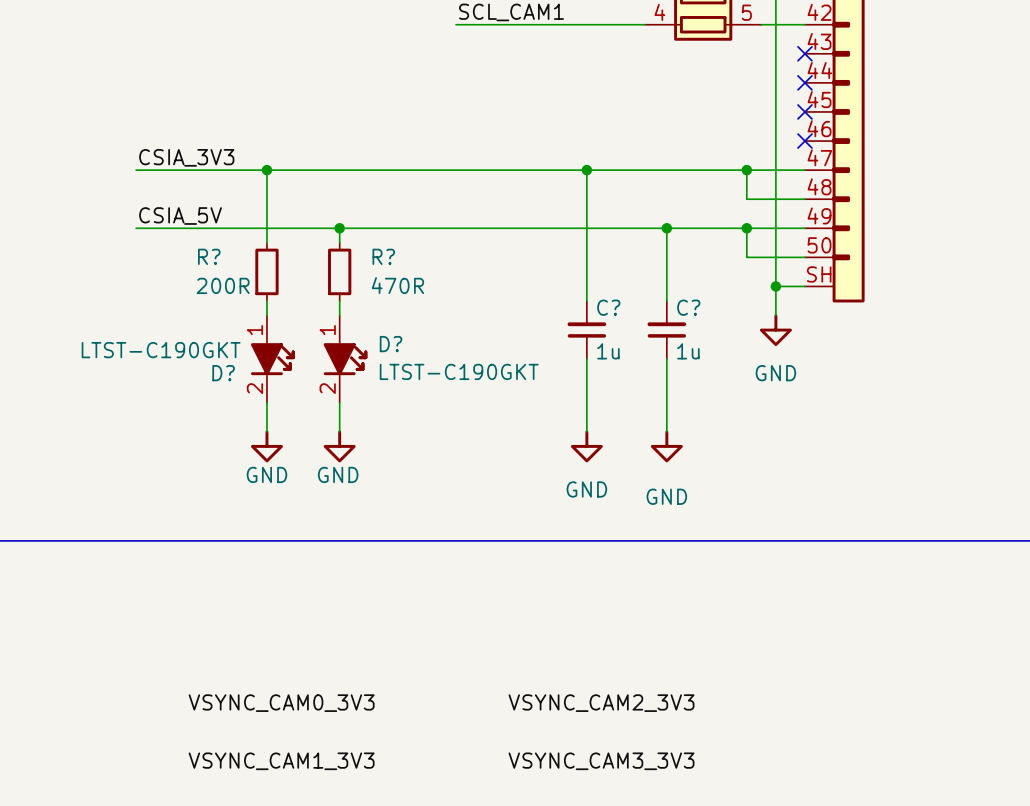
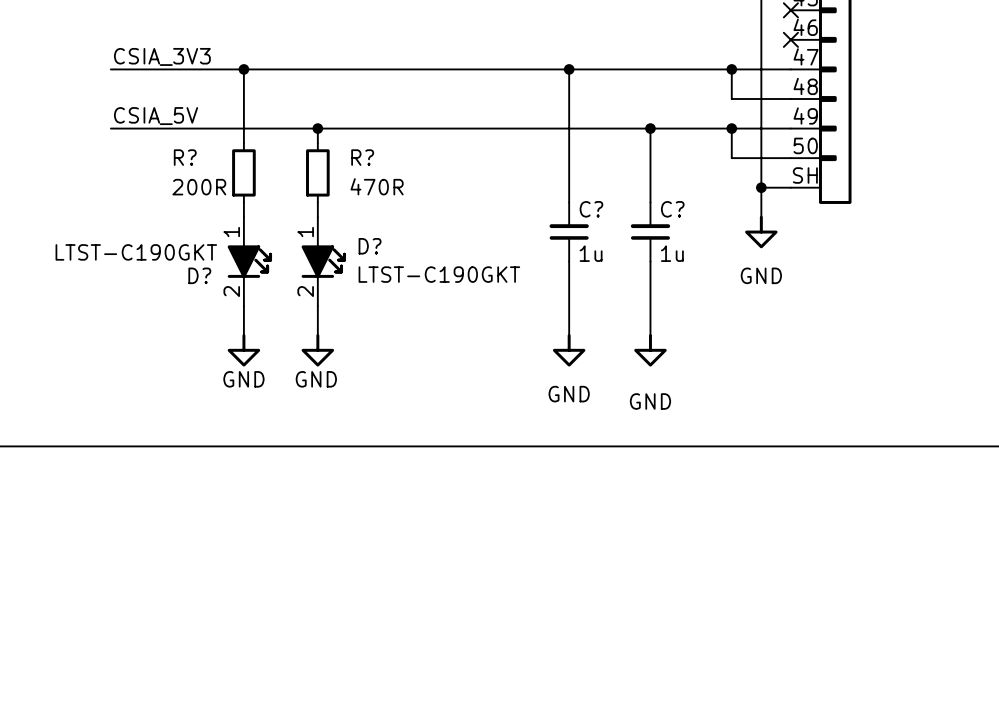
label: VSYNC_CAM0_3V3 (281, 703) -> none
label: VSYNC_CAM2_3V3 (601, 703) -> none
label: VSYNC_CAM1_3V3 (281, 761) -> none
label: VSYNC_CAM3_3V3 (601, 761) -> none

